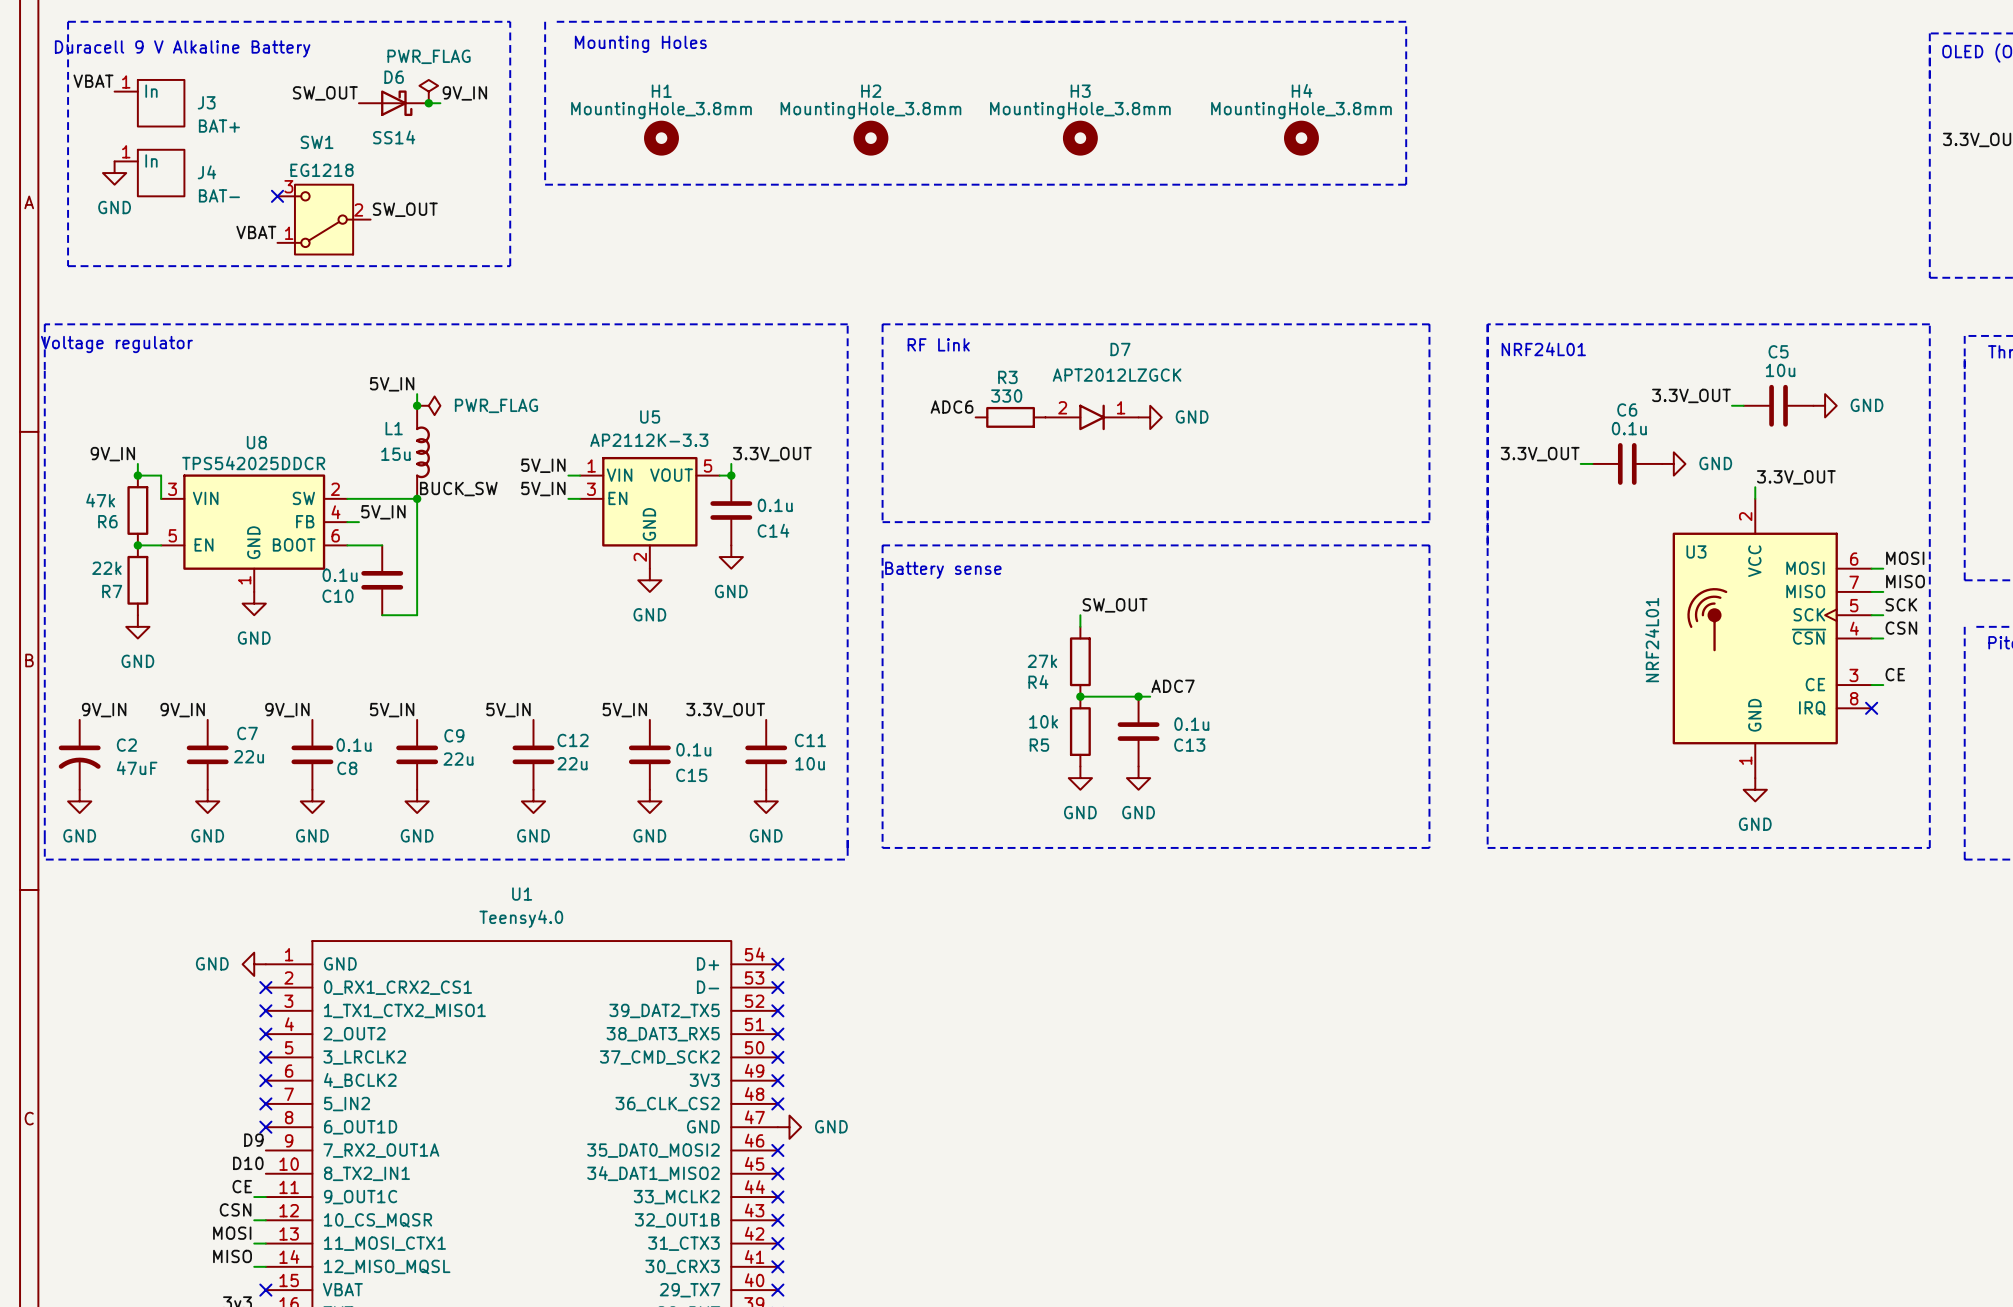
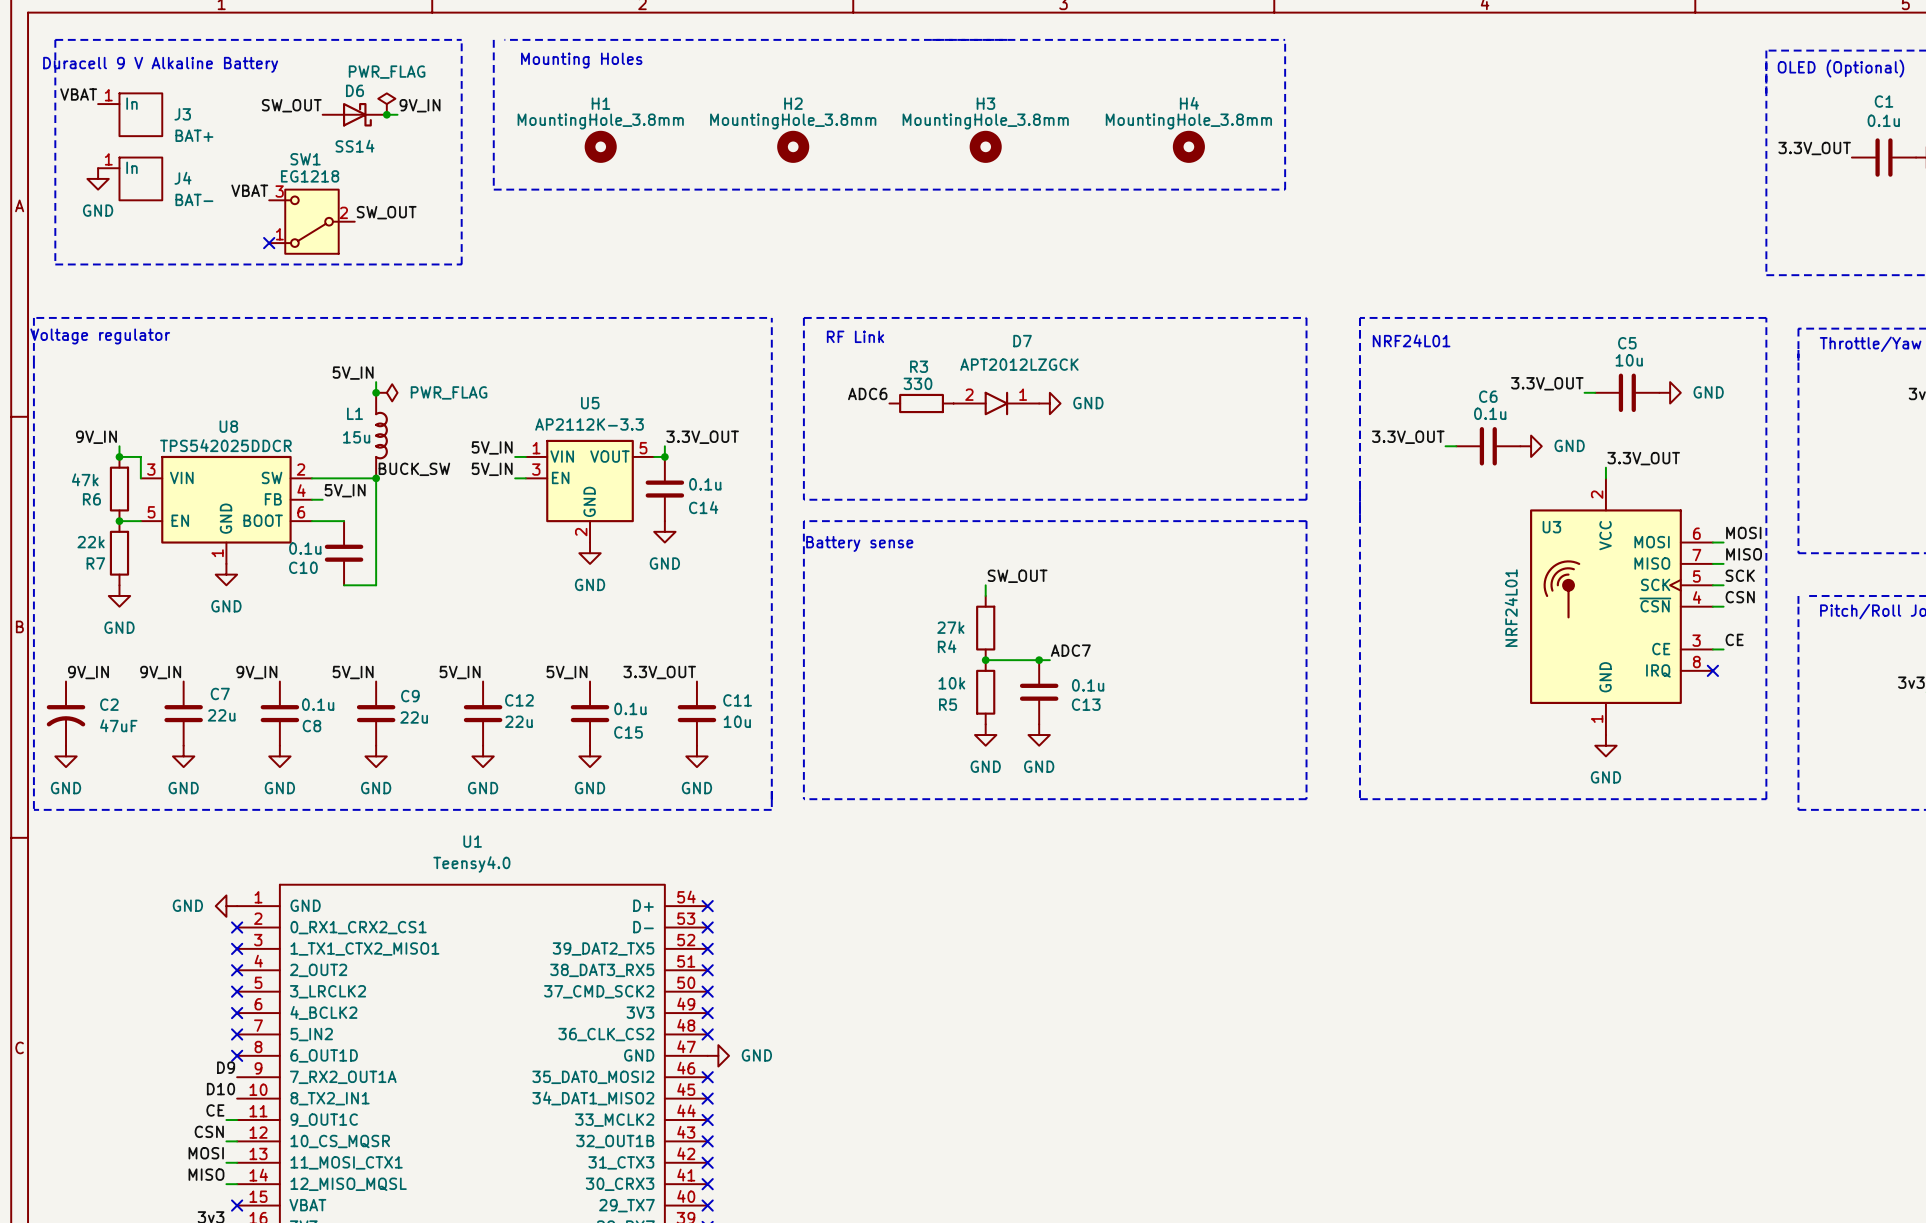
SW1 name position: SW1 (317, 142) -> SW1 (305, 159)
no-connect mark position: (277, 196) -> (269, 243)
label position: SW_OUT (405, 209) -> SW_OUT (386, 212)
SW1 position: (324, 219) -> (311, 221)
label position: VBAT (256, 232) -> VBAT (249, 190)

